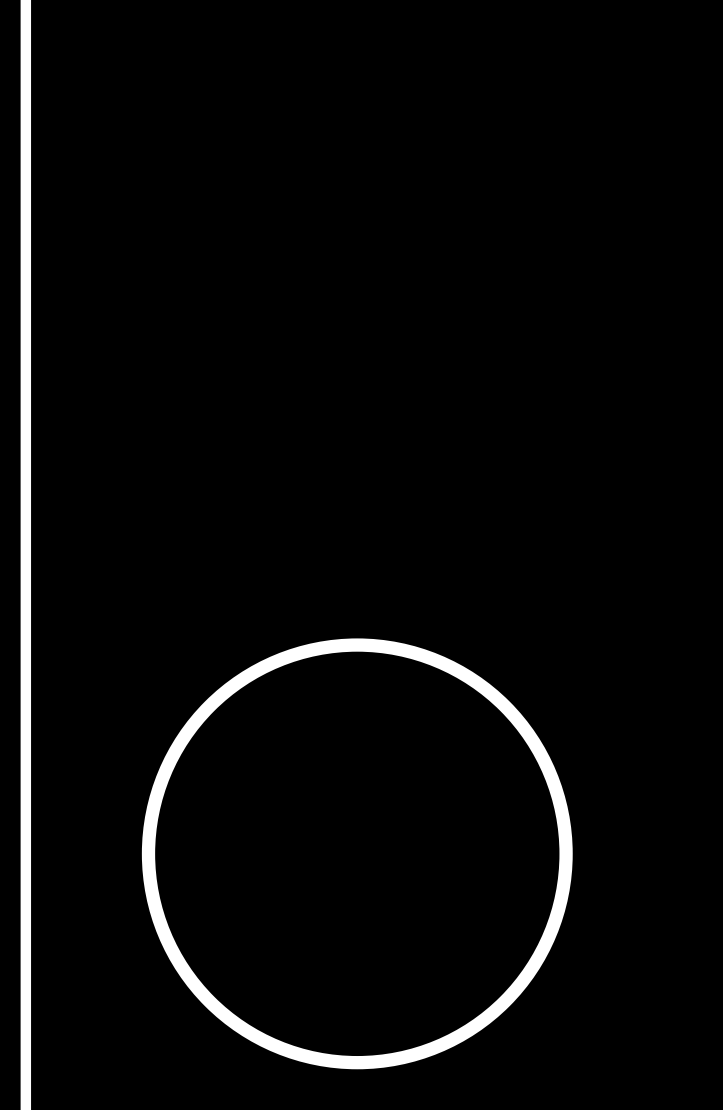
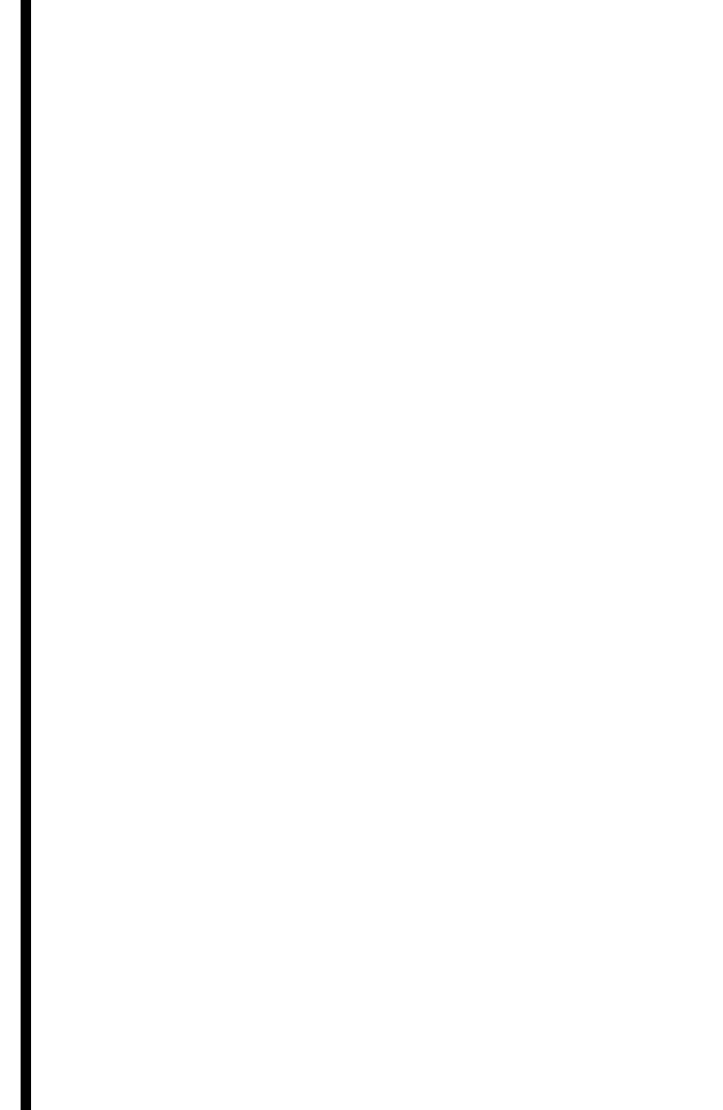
round board edge: [141, 638, 573, 1070] -> none

